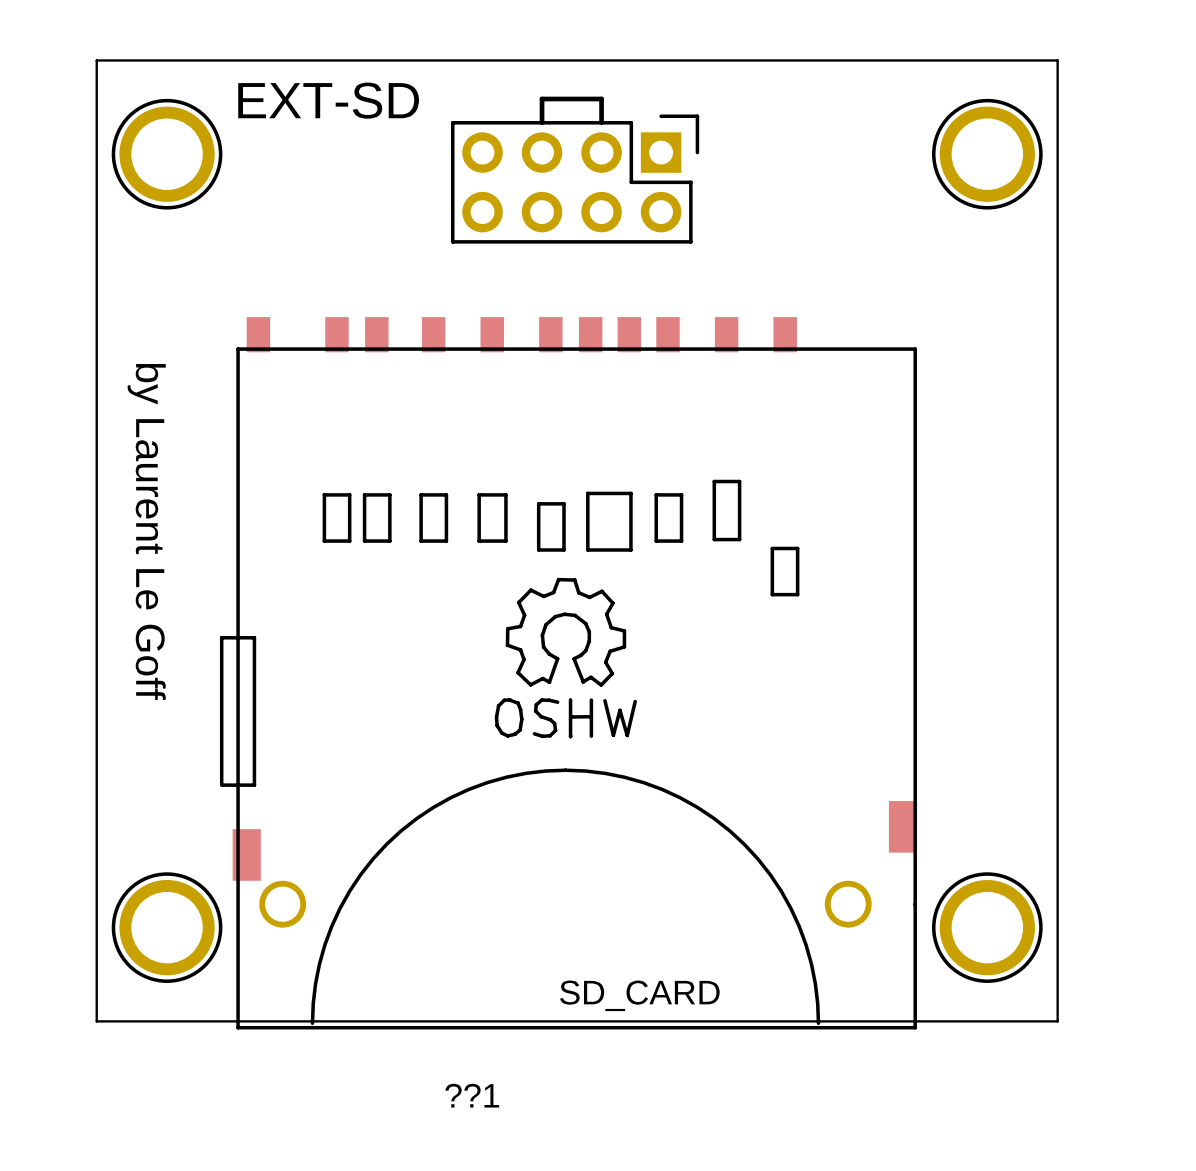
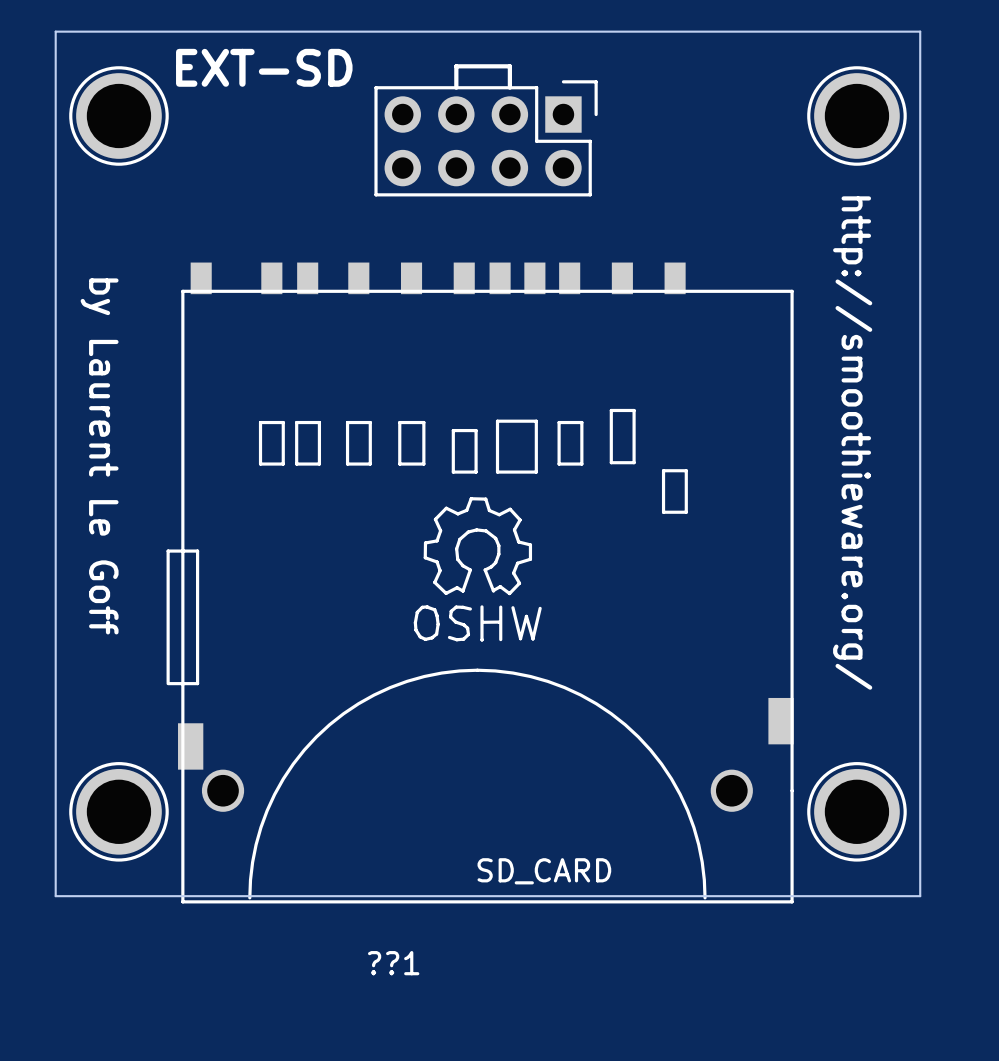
text: none -> http://smoothieware.org/ (852, 443)

